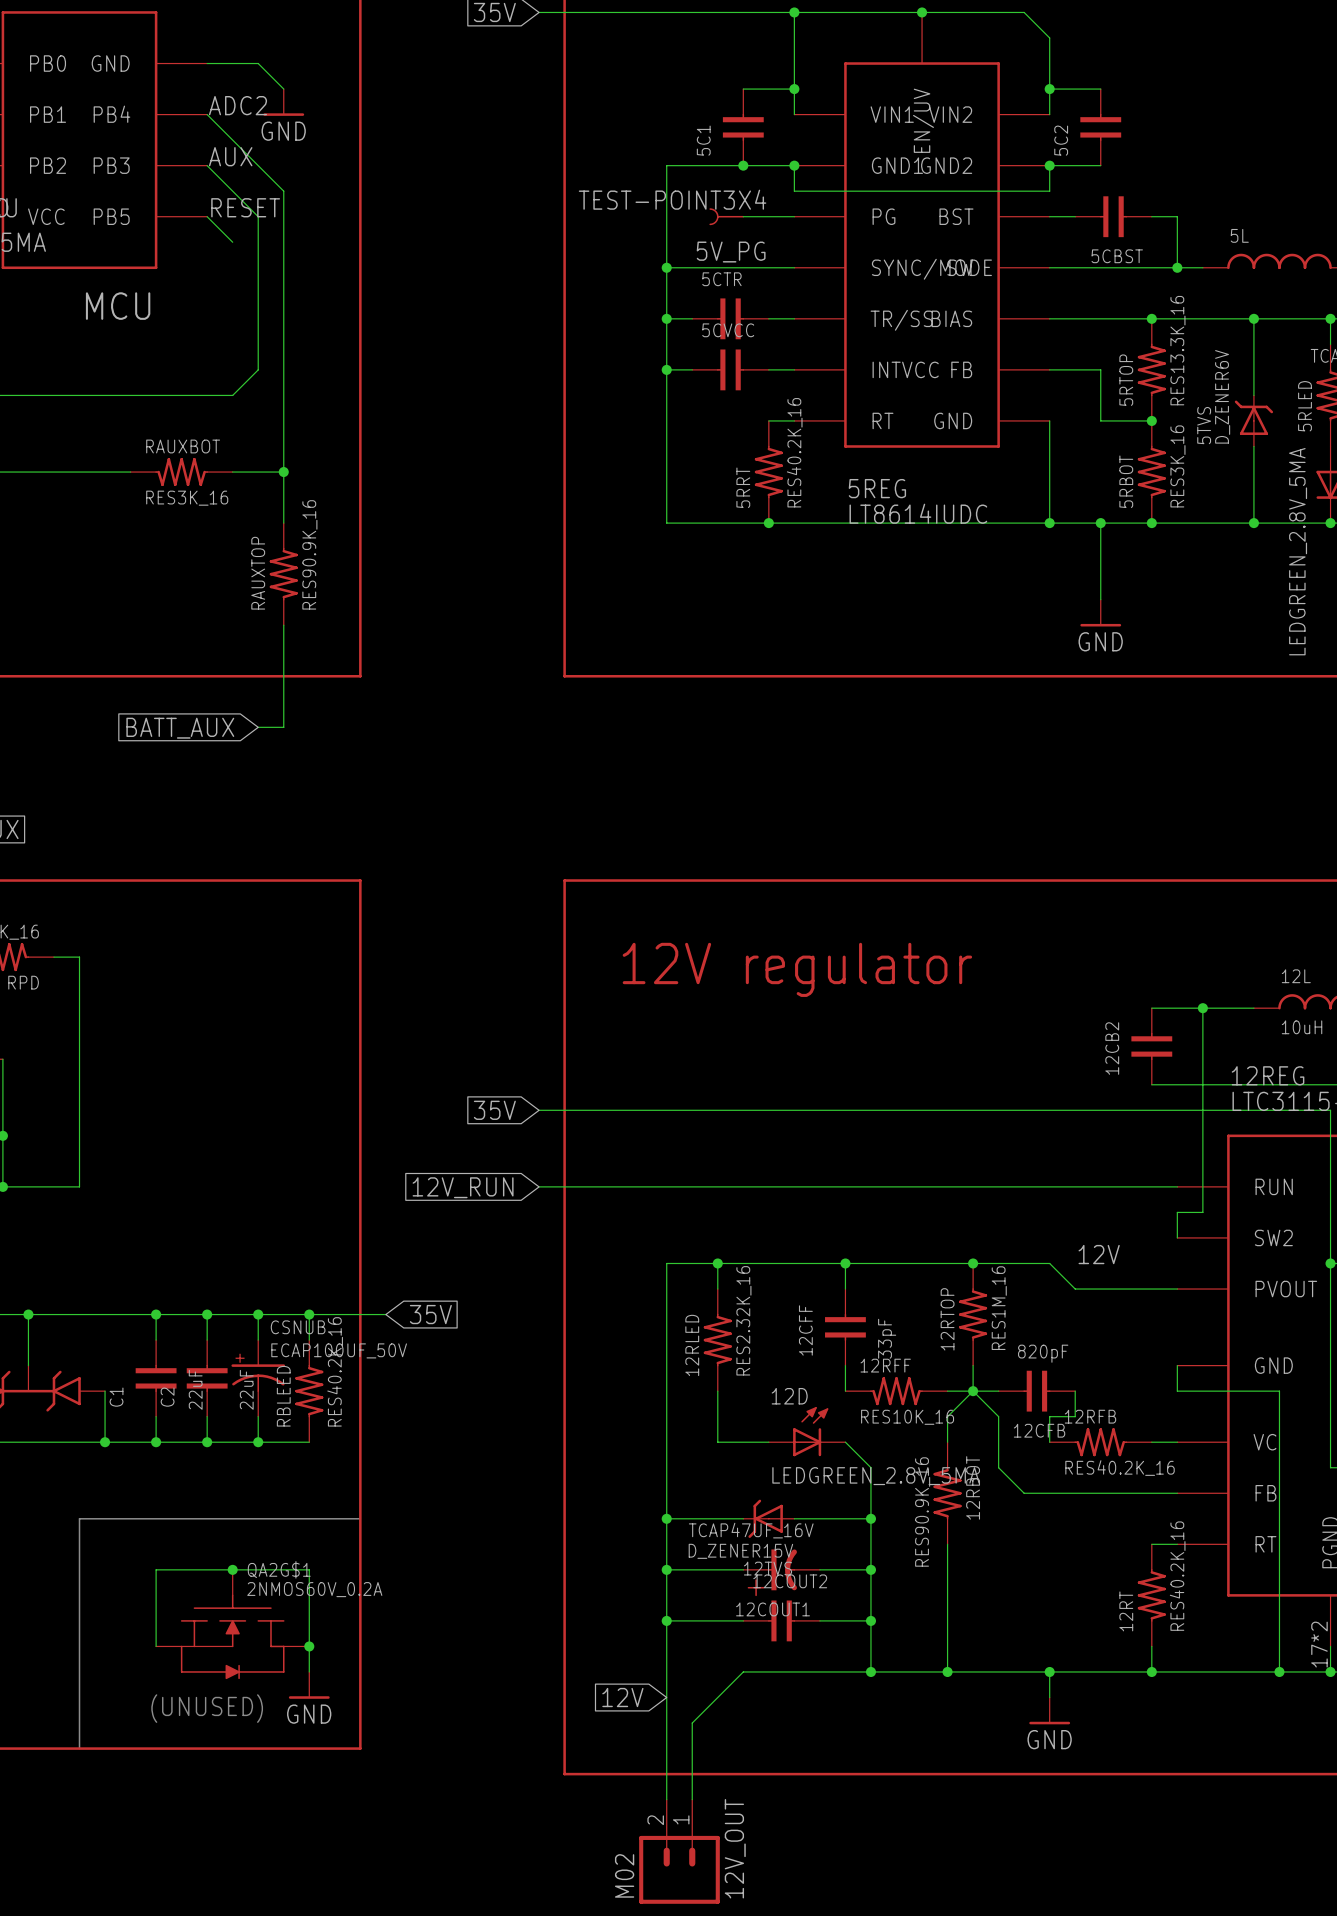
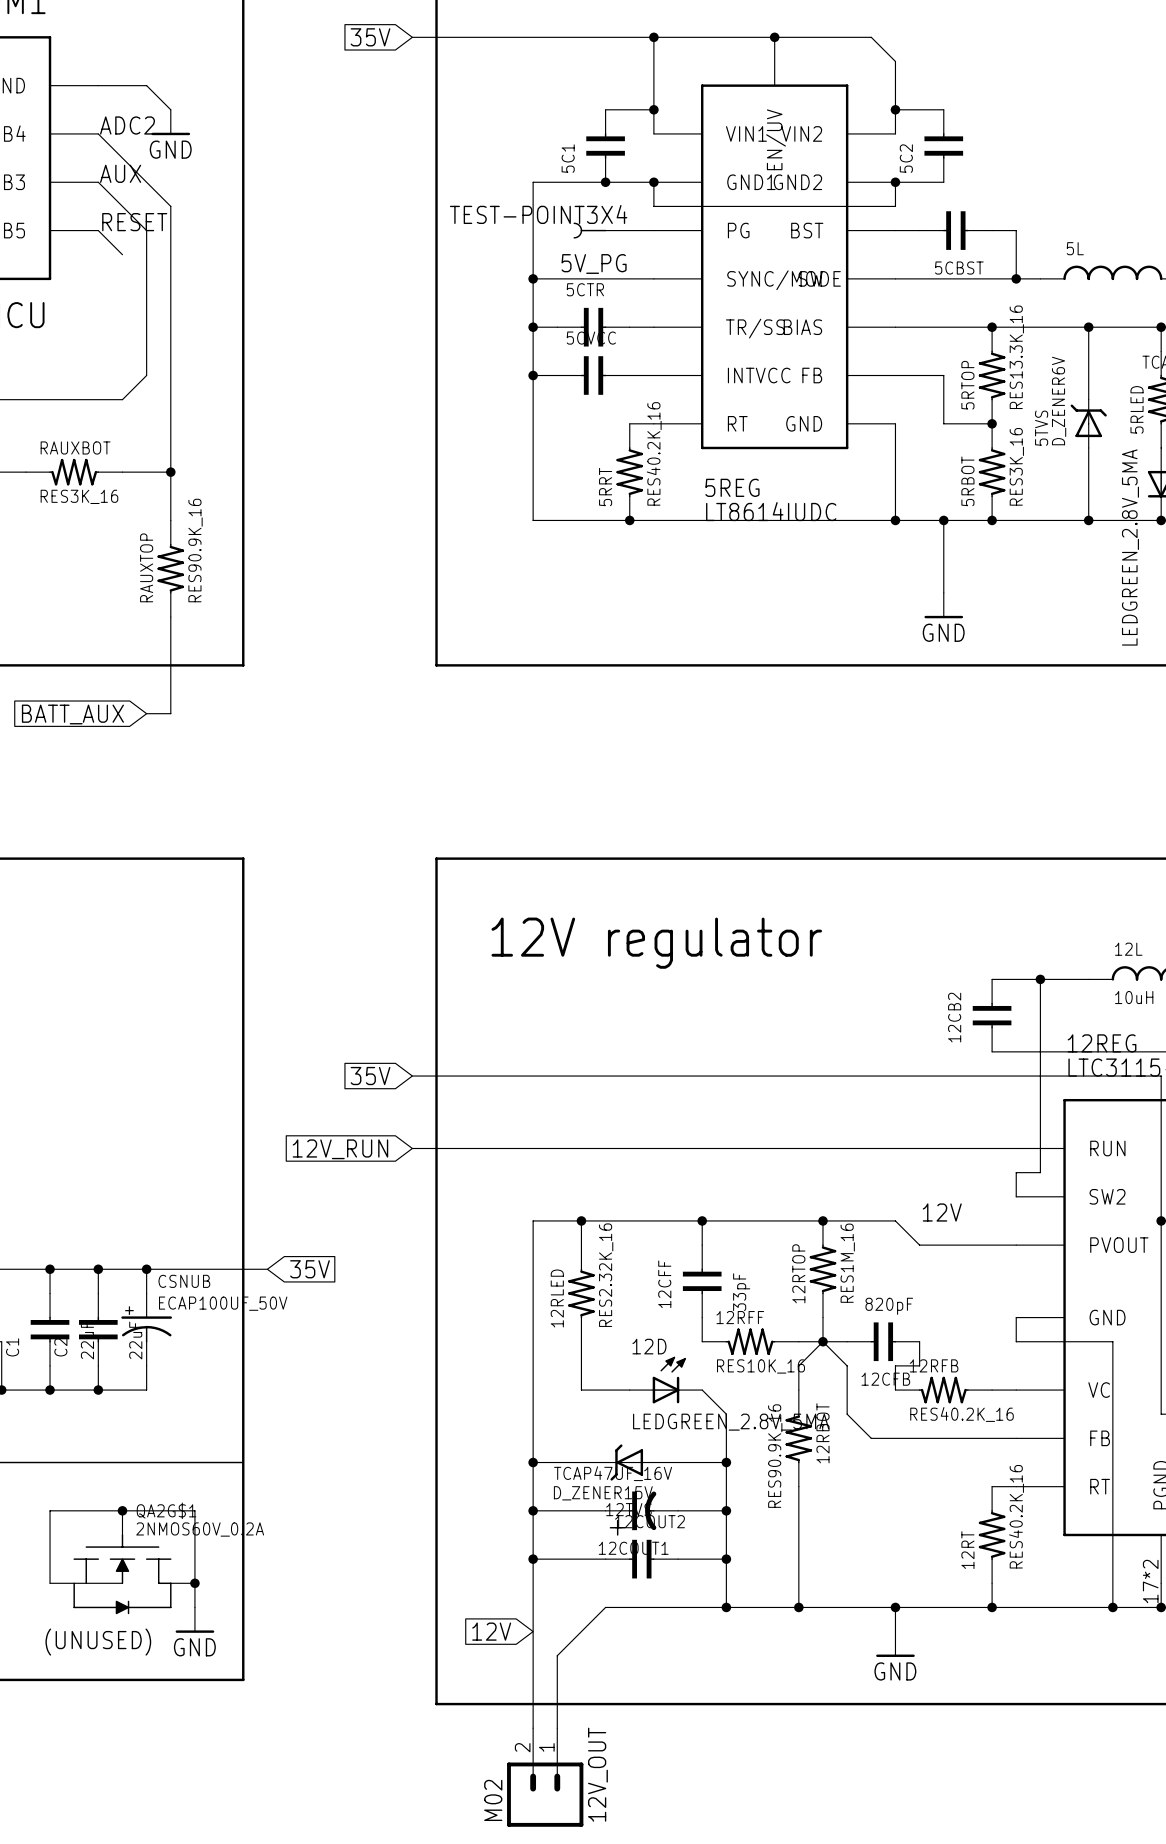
wire: (309, 1314) (309, 1340) -> none
junction: (309, 1314) -> none
RBLEED: RES40.2K_16 (309, 1391) -> none
wire: (258, 1442) (309, 1442) -> none
junction: (258, 1442) -> none

